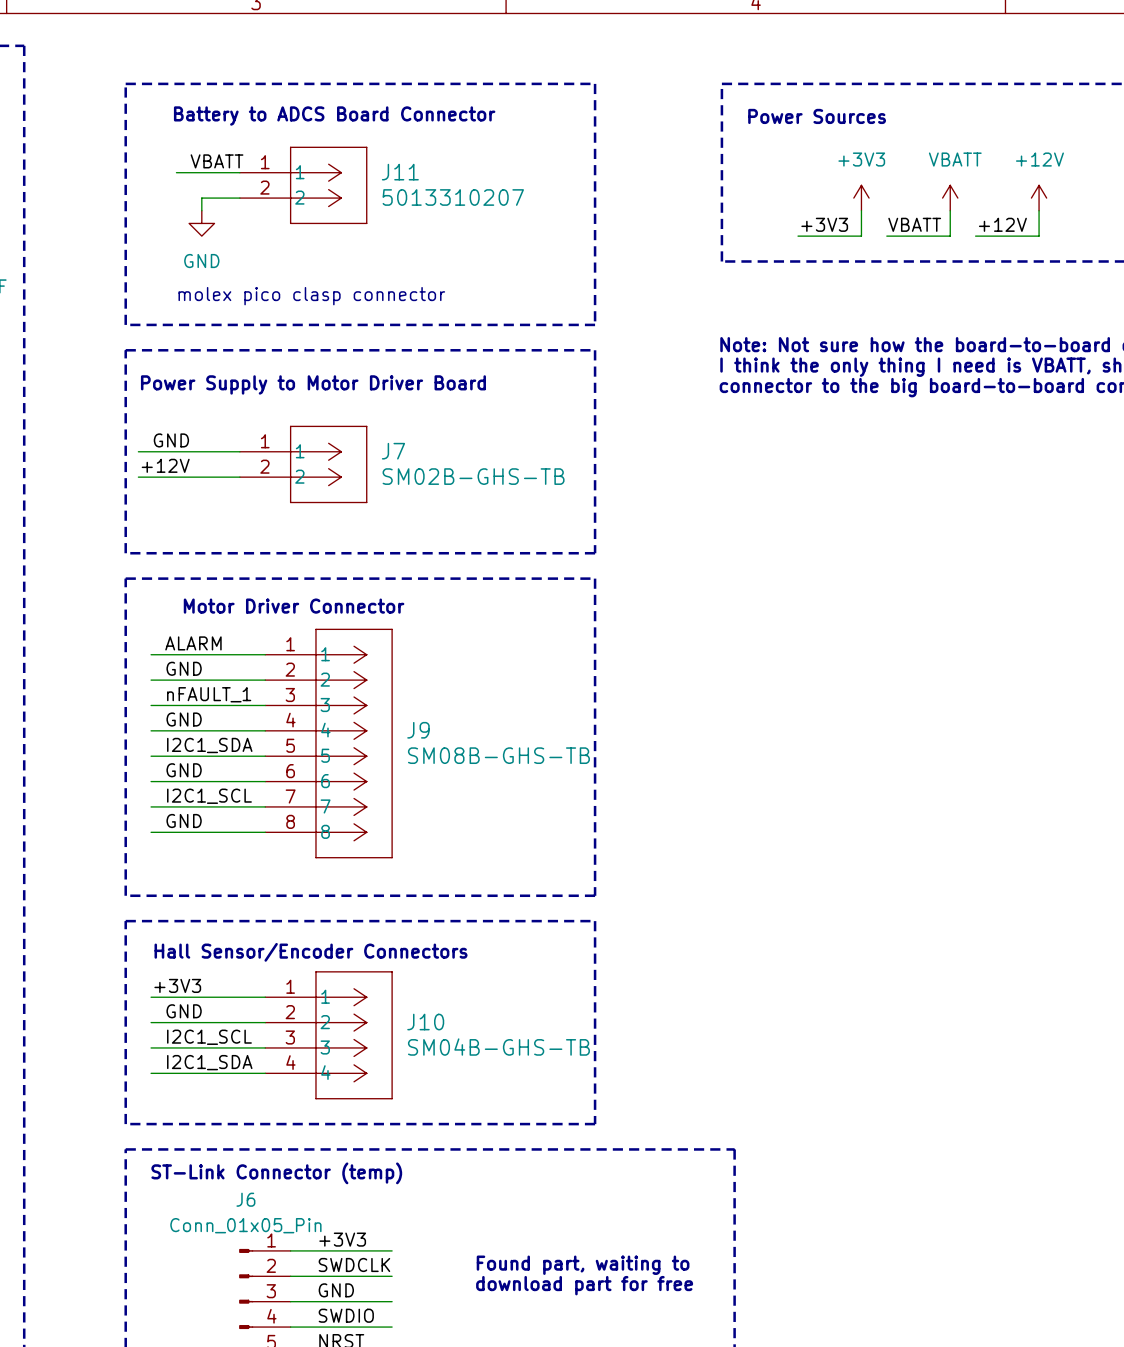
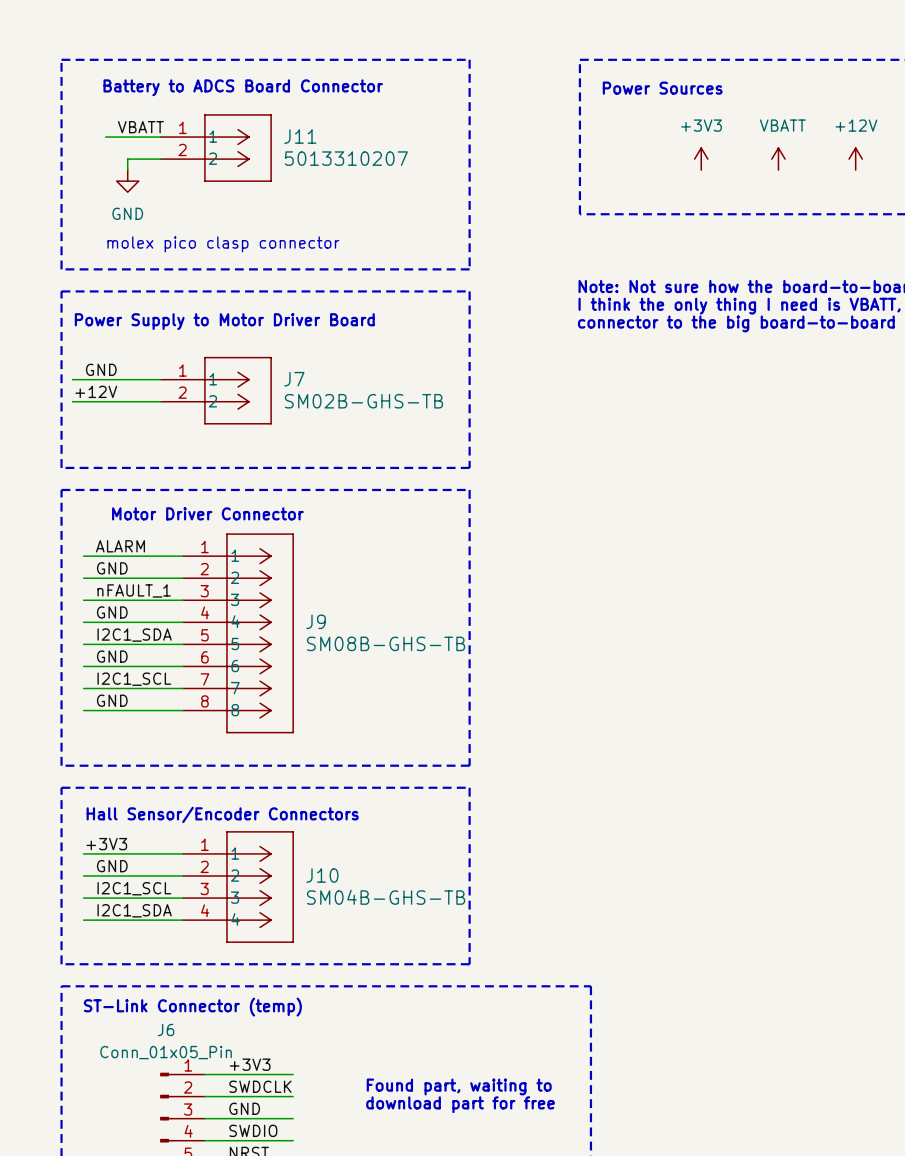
wire: (861, 210) (861, 236) (798, 236) -> none
wire: (950, 210) (950, 236) (886, 236) -> none
wire: (1039, 210) (1039, 236) (975, 236) -> none
label: +3V3 (824, 224) -> none
label: VBATT (914, 224) -> none
label: +12V (1002, 224) -> none

